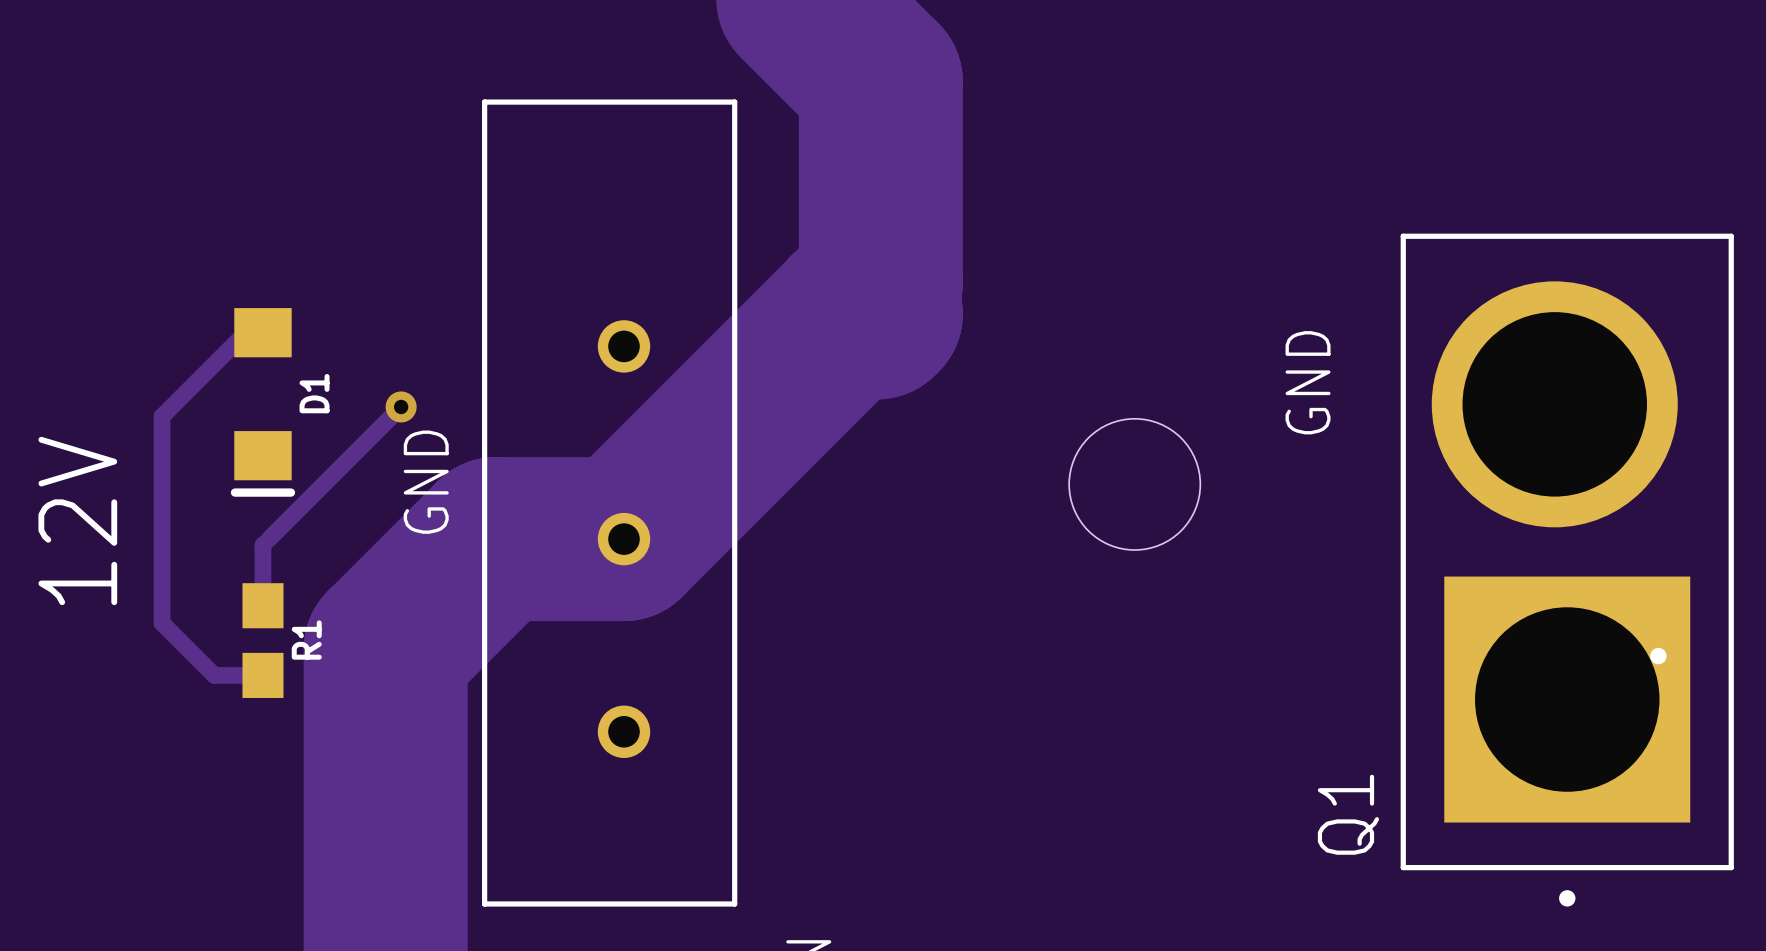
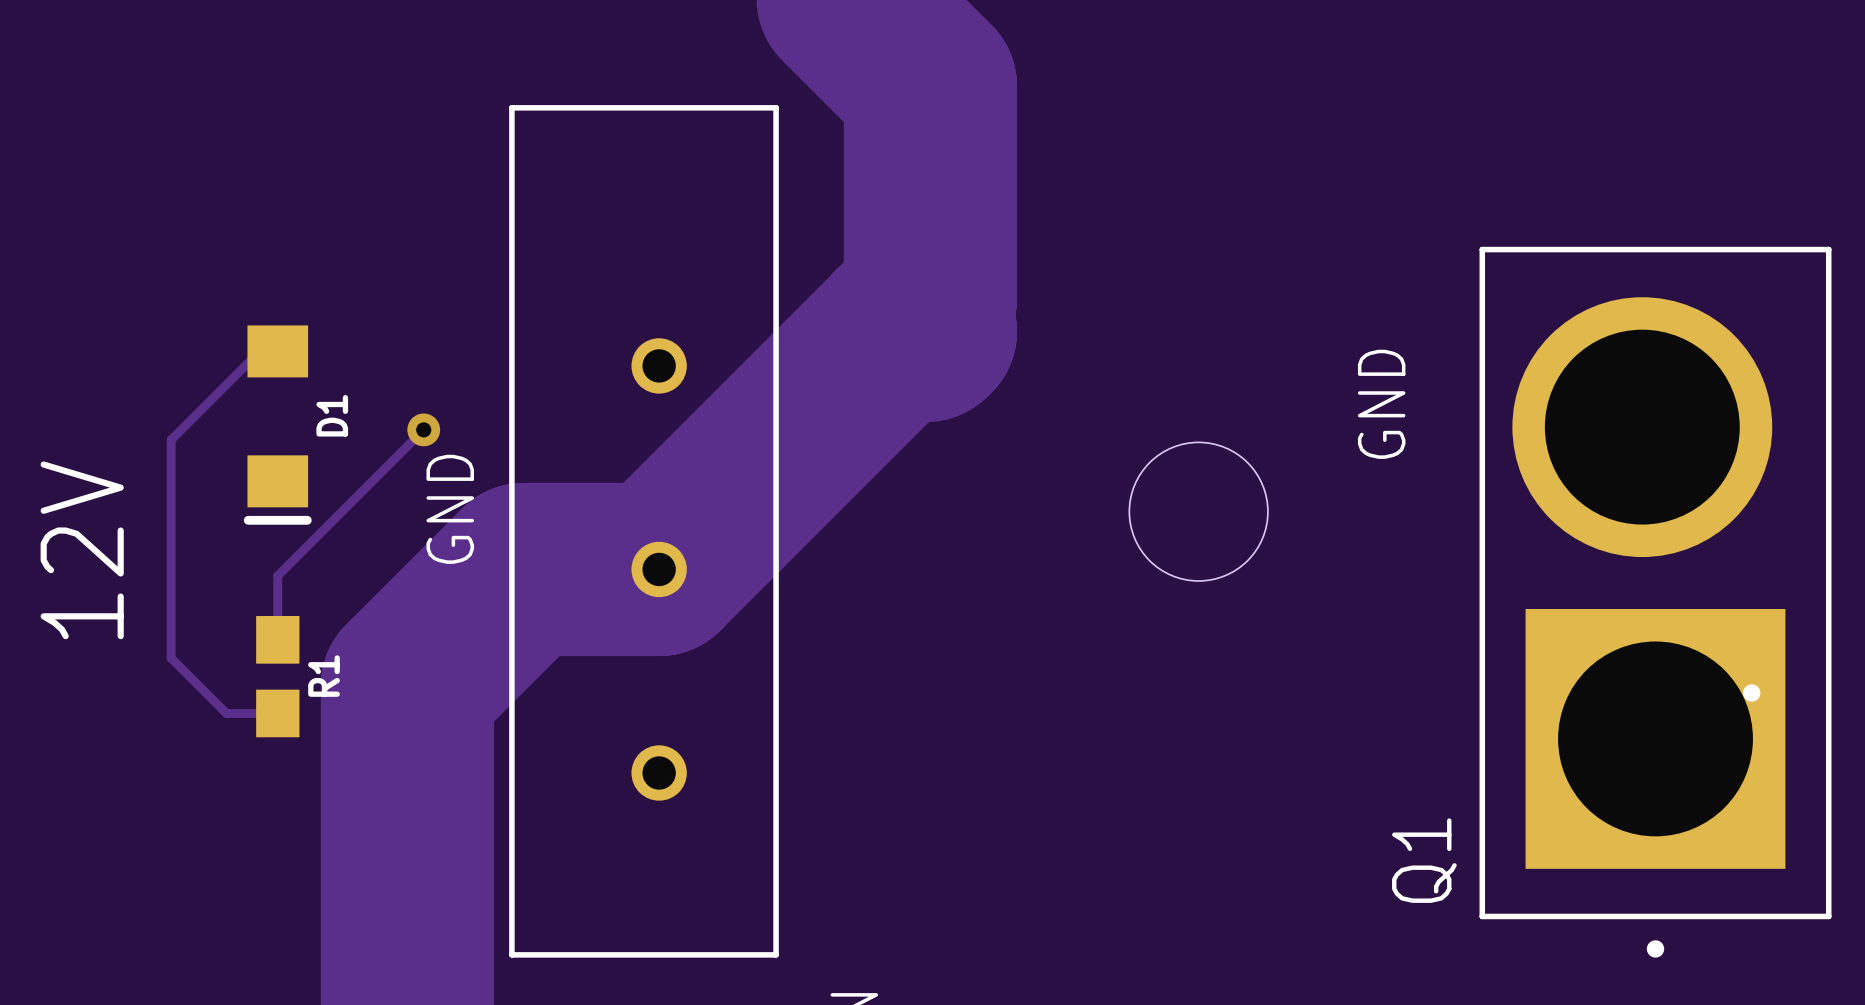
track width: thick (238, 339) (162, 416) (162, 623) (214, 675) (262, 675) -> thin (252, 358) (171, 439) (171, 658) (226, 713) (277, 713)
track width: thick (401, 406) (268, 539) -> thin (423, 429) (284, 569)
track width: thick (264, 543) (262, 605) -> thin (279, 574) (277, 575) (277, 639)

